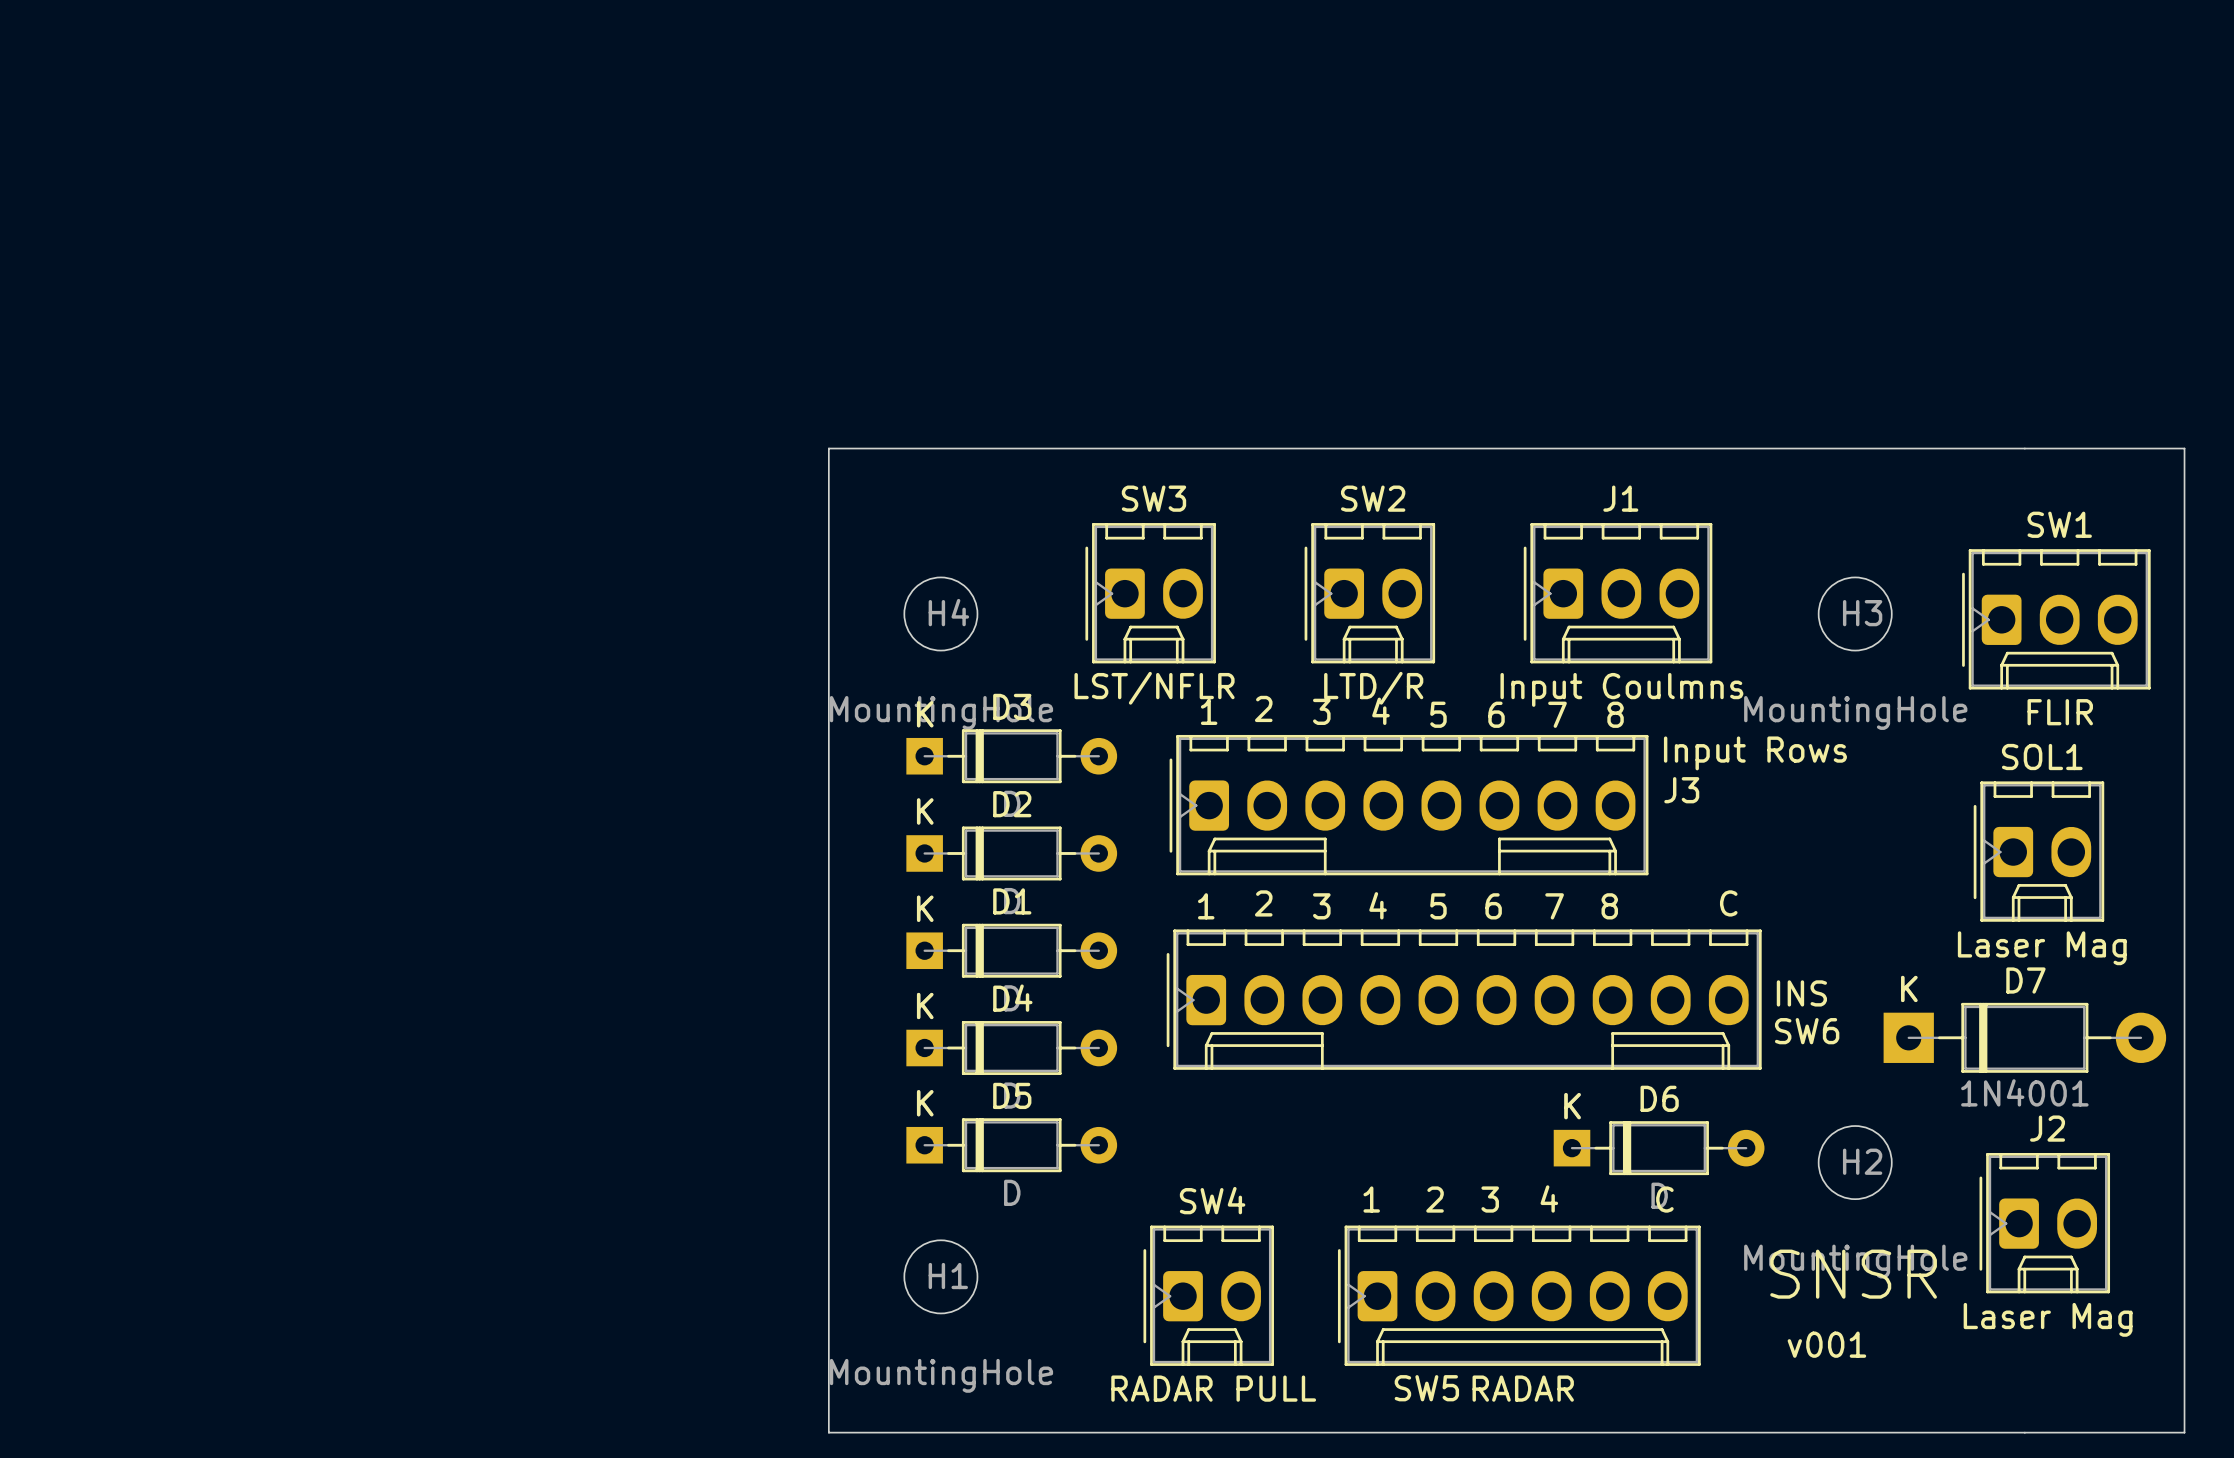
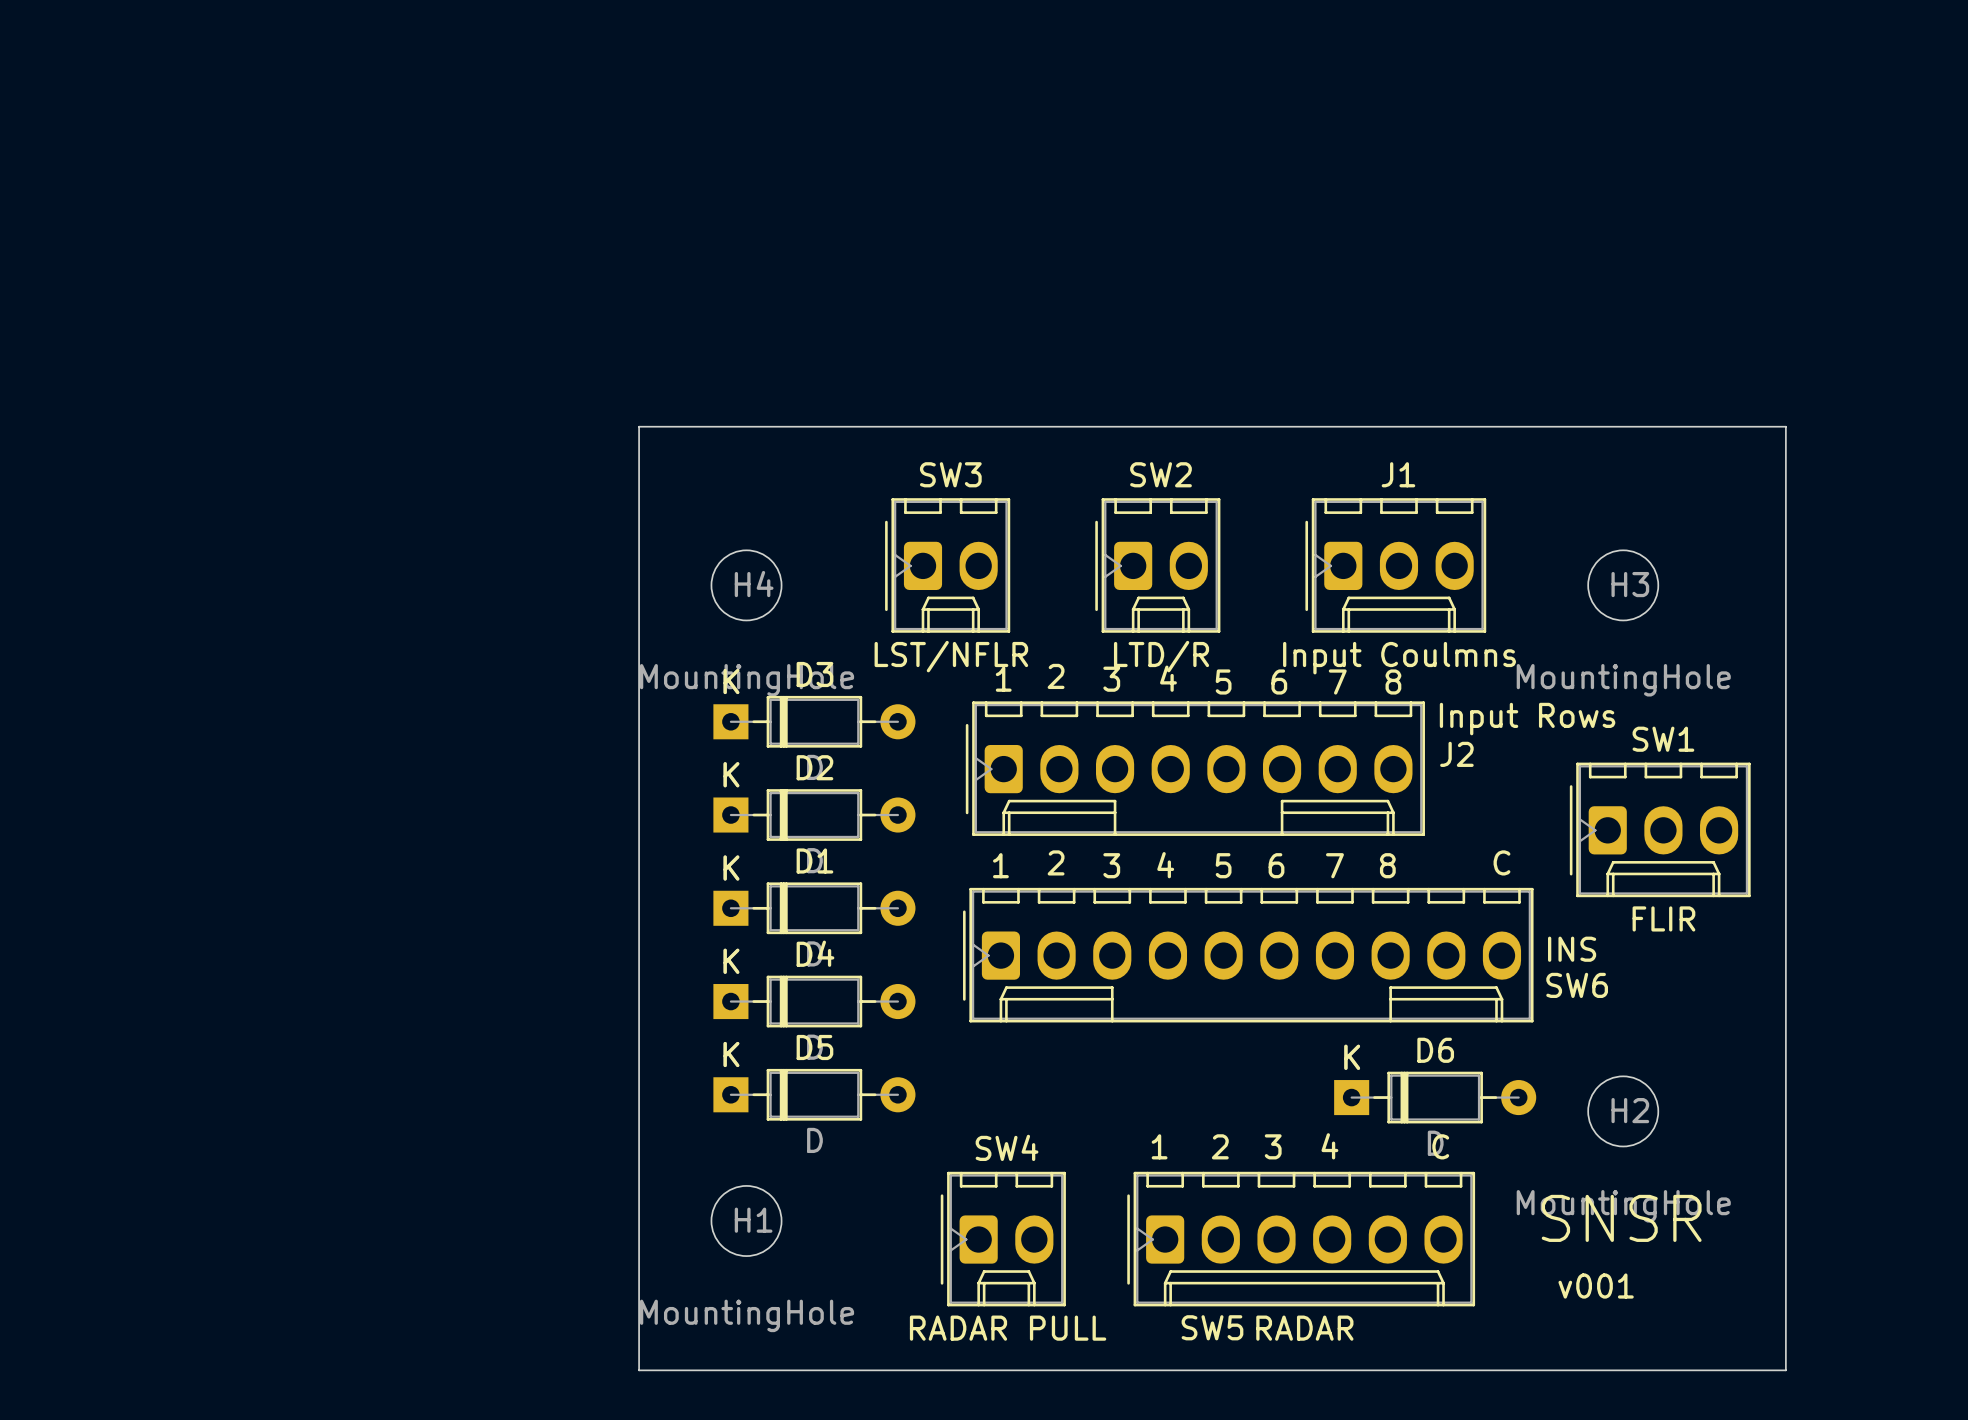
board edge: (2024, 448) (2184, 448) (2184, 1432) (2024, 1432) -> (1785, 426) (1785, 1370)
SW1 position: (2056, 619) -> (1660, 829)
J3 name: J3 (1681, 790) -> J2 (1456, 754)
SOL1: Laser Mag (2038, 851) -> none
D7: 1N4001 (2024, 1037) -> none
J2: Laser Mag (2044, 1223) -> none

